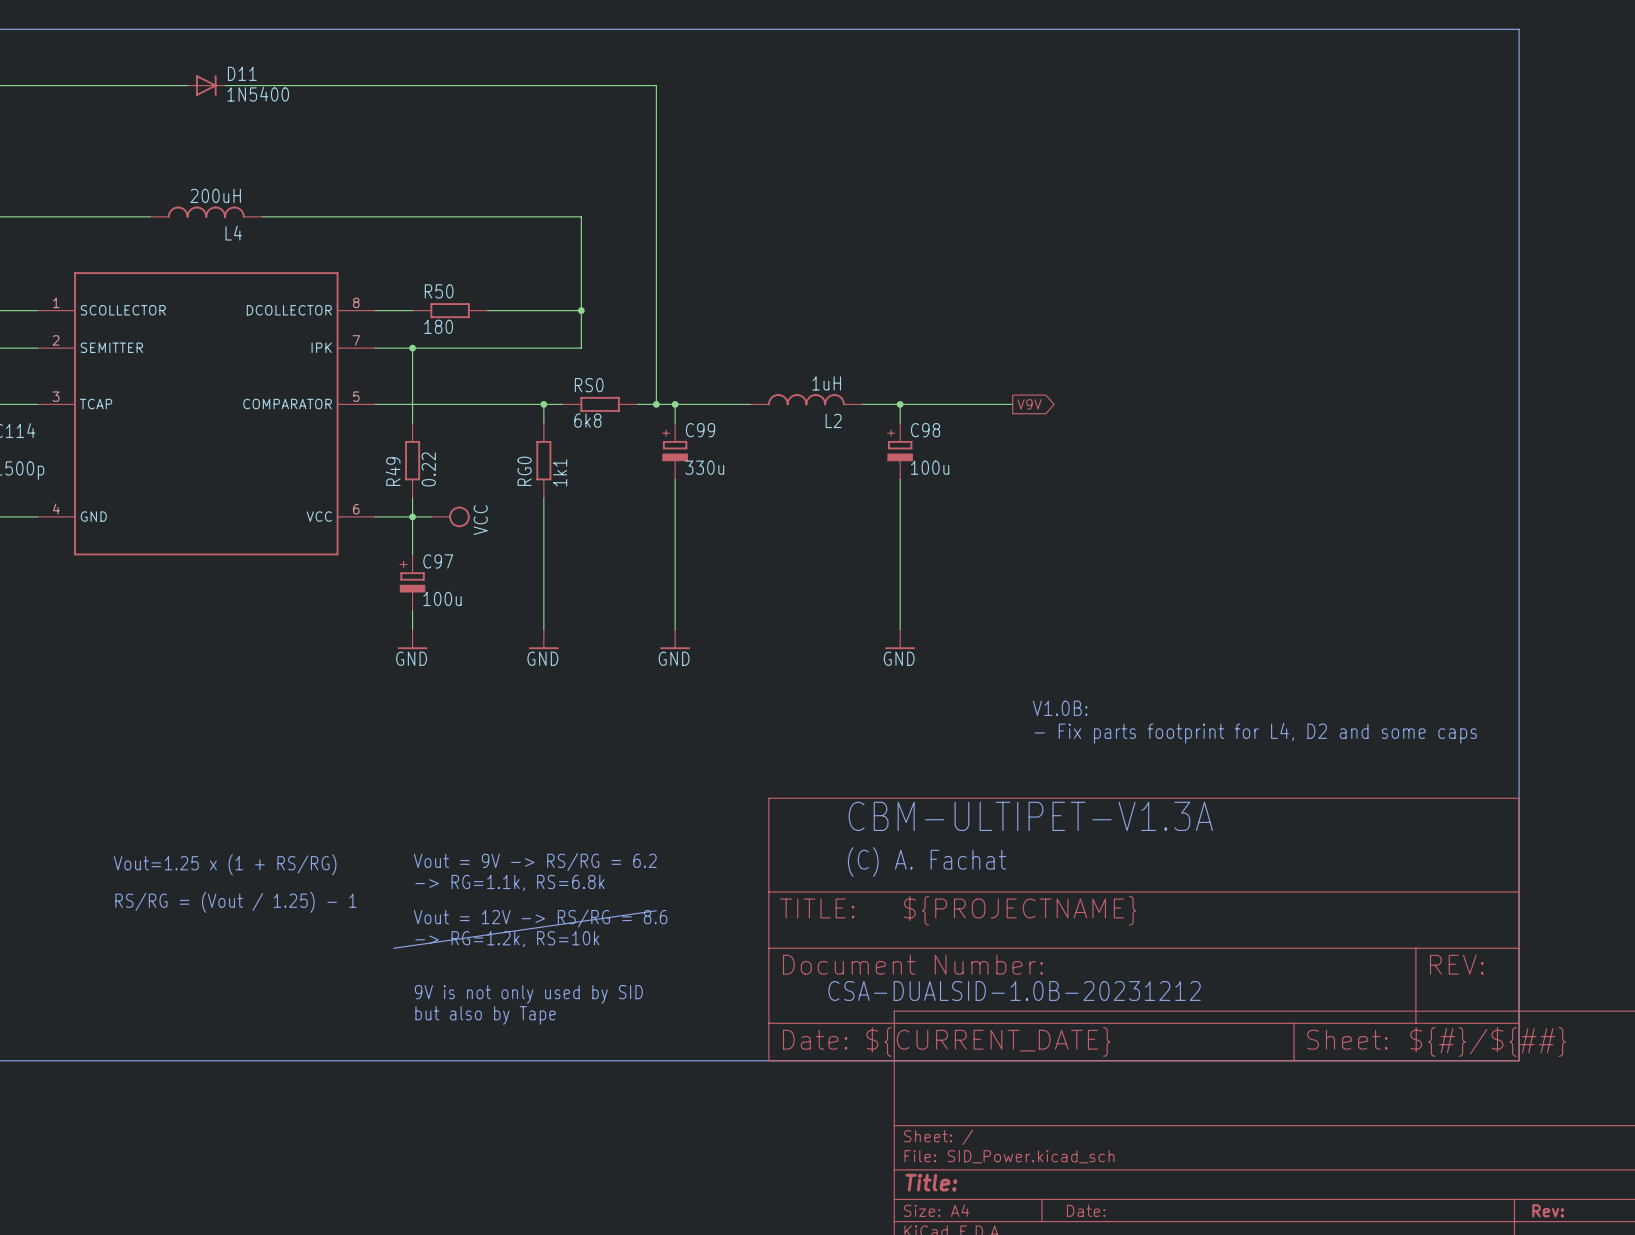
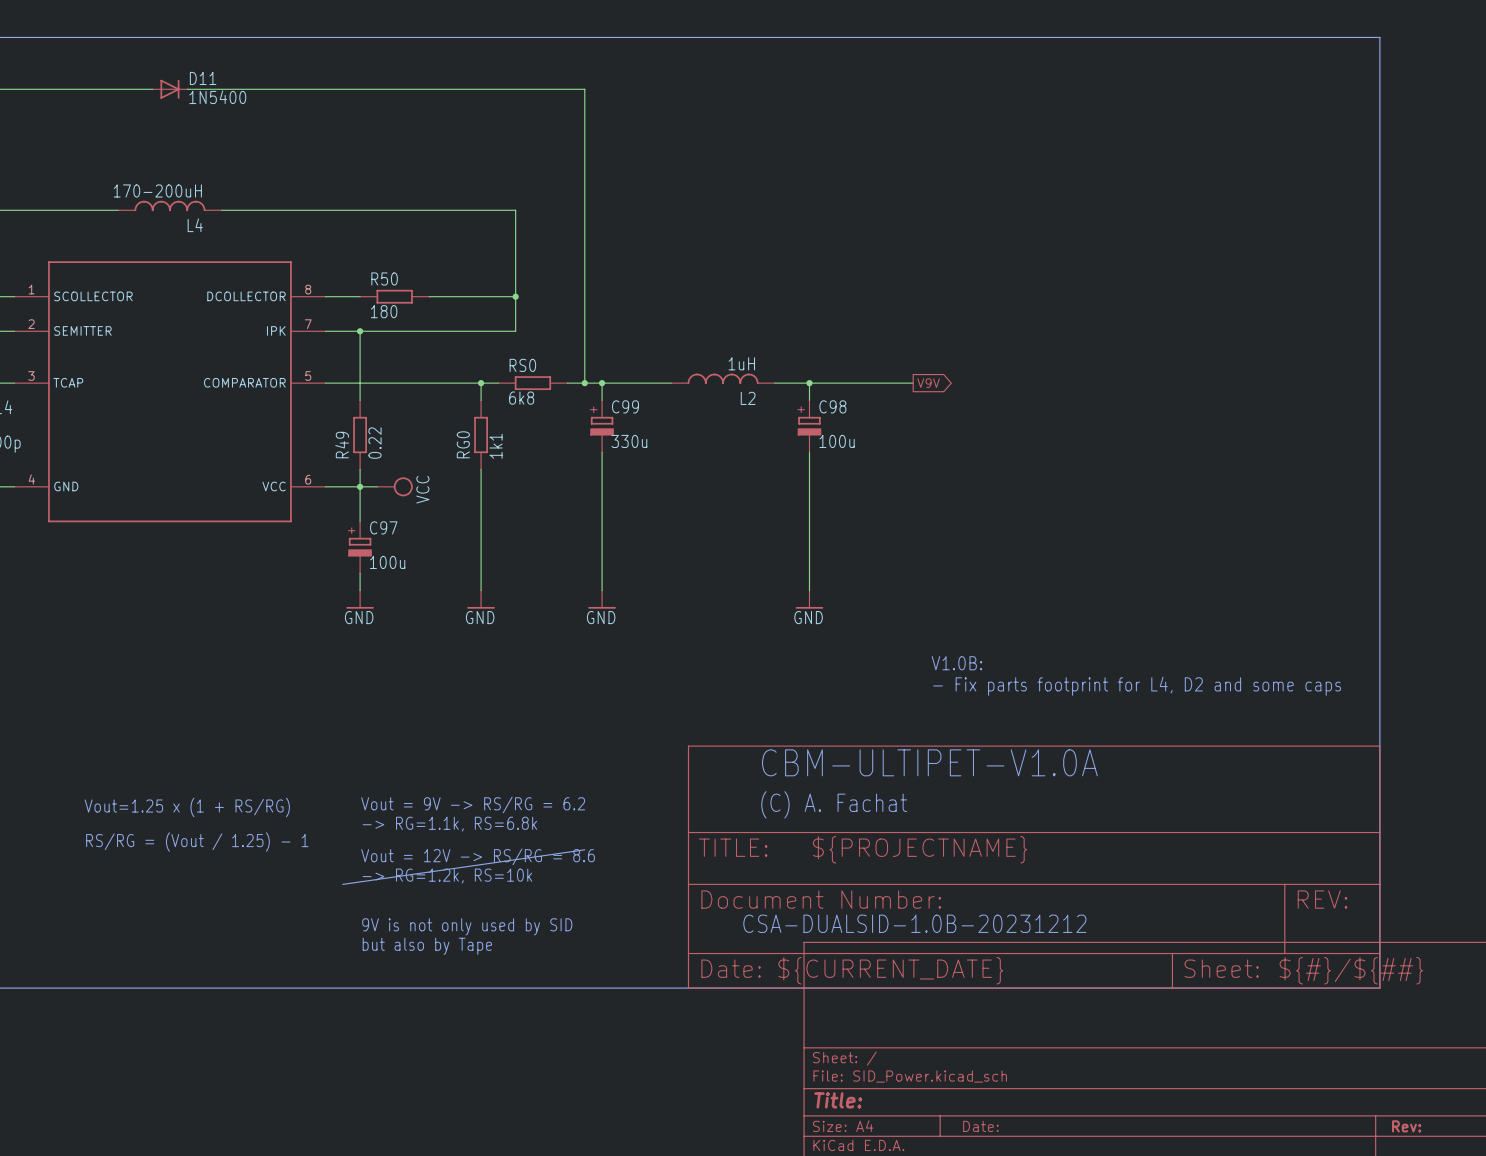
L4 value: 200uH (215, 195) -> 170-200uH (157, 190)
text: CBM-ULTIPET-V1.3A (1030, 816) -> CBM-ULTIPET-V1.0A (929, 762)

